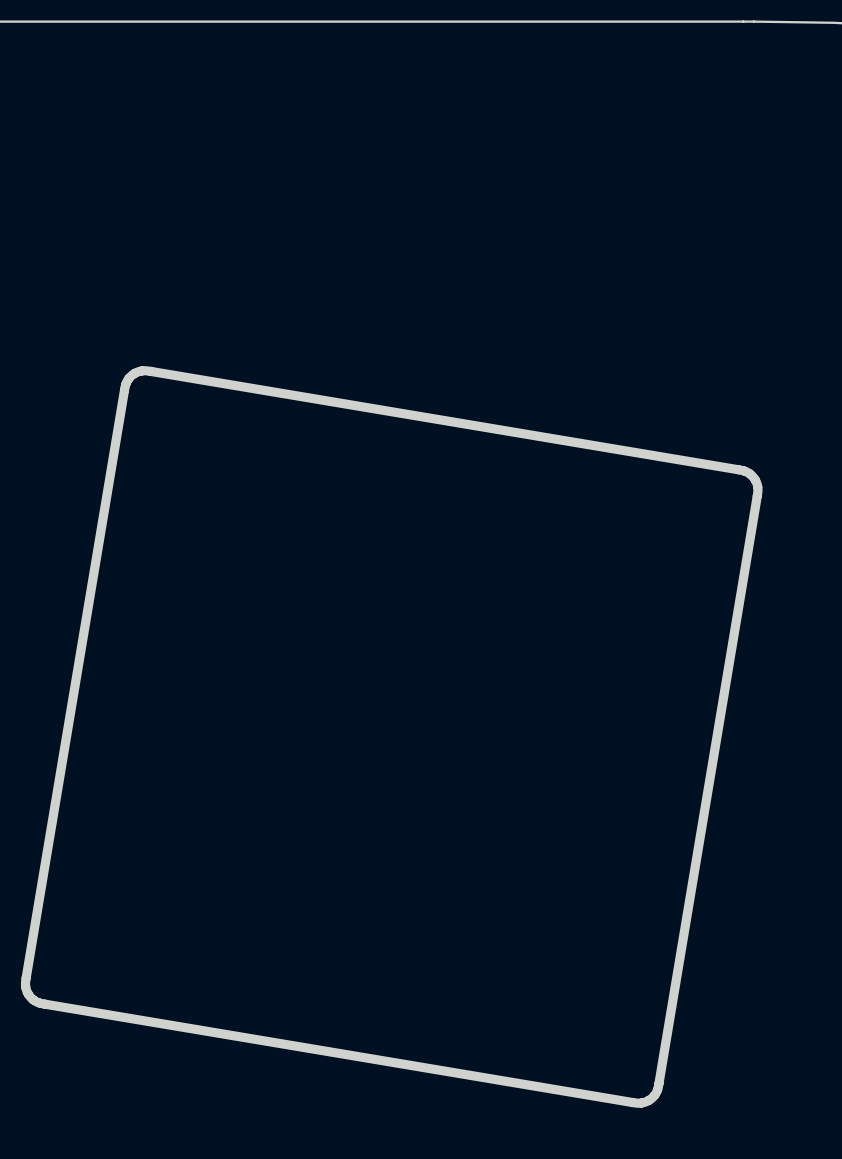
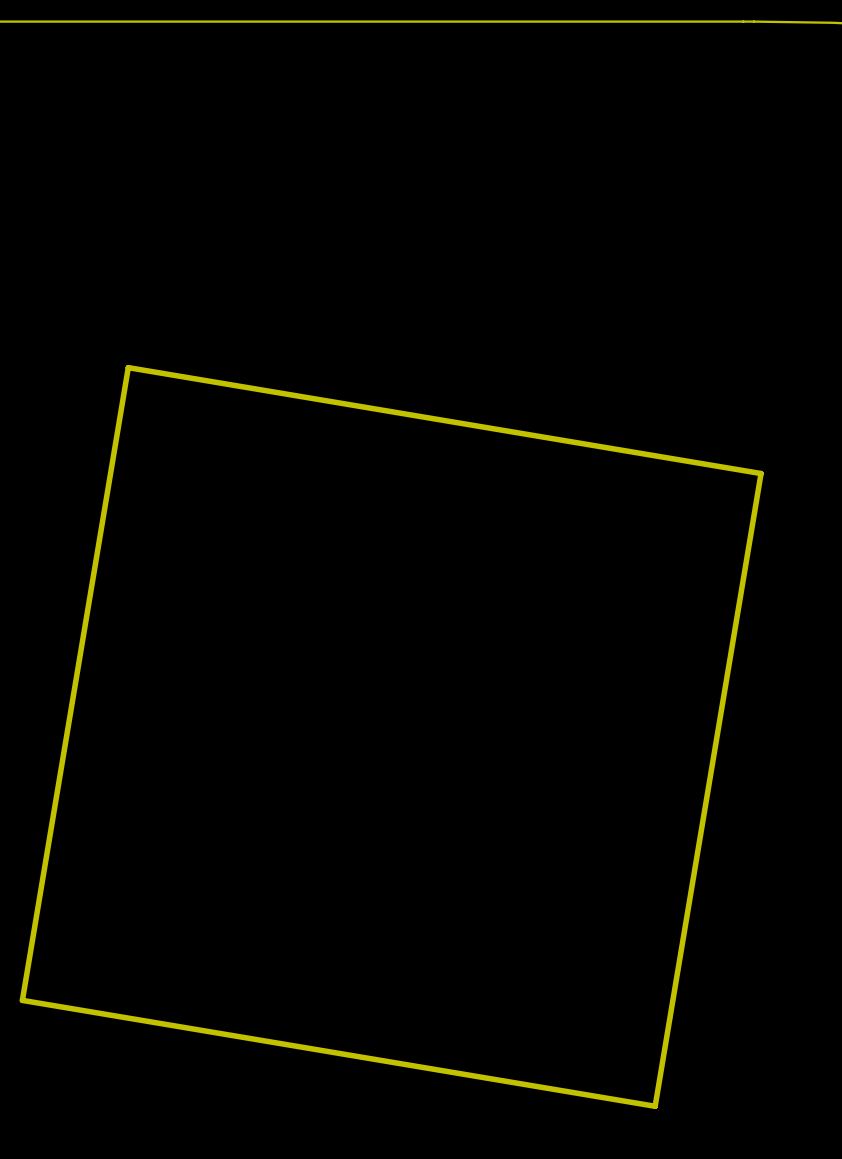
drawing shape: [20, 366, 763, 1108] -> [19, 364, 764, 1110]

